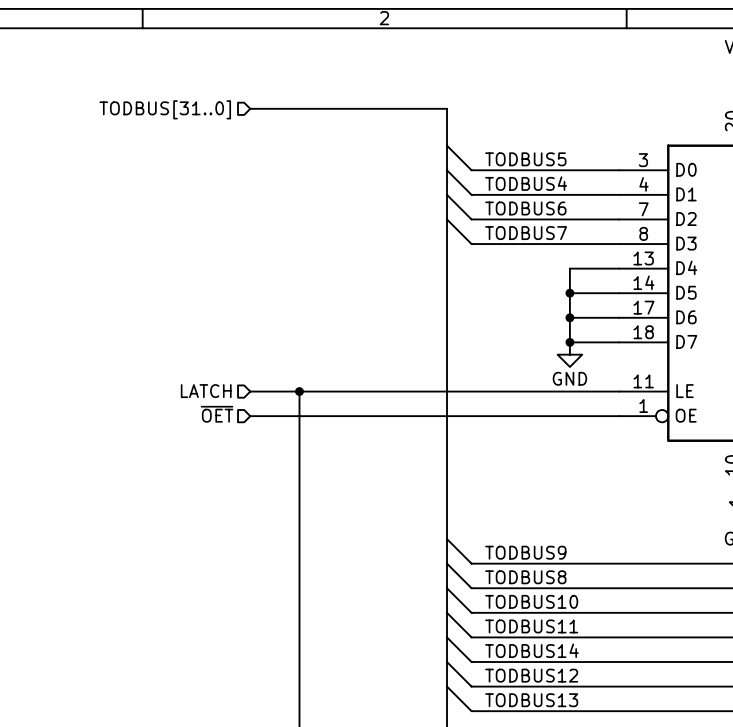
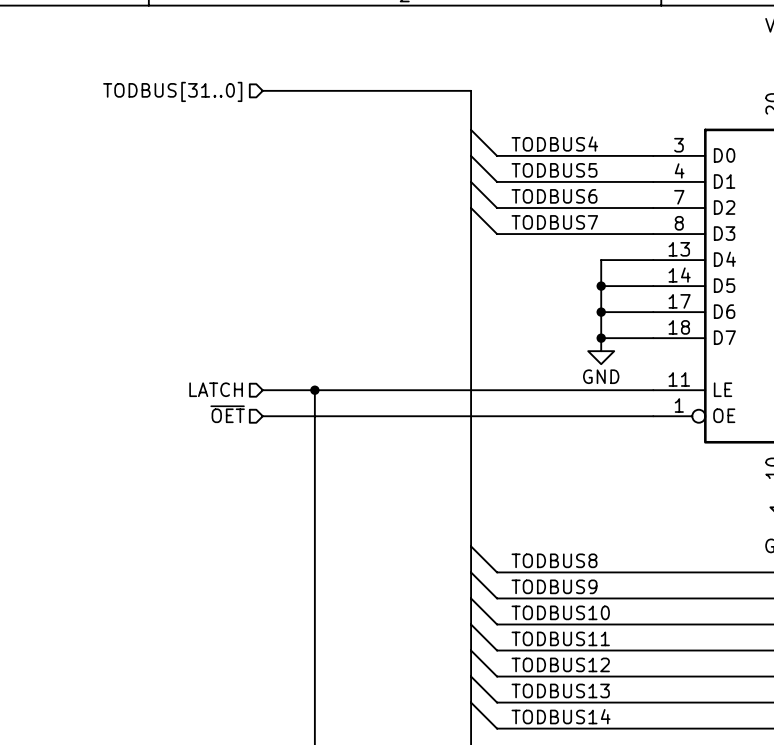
label: TODBUS5 (525, 159) -> TODBUS4 (554, 144)
label: TODBUS4 (526, 183) -> TODBUS5 (554, 170)
label: TODBUS9 (525, 552) -> TODBUS8 (554, 560)
label: TODBUS8 (525, 577) -> TODBUS9 (554, 586)
label: TODBUS14 (531, 650) -> TODBUS12 (560, 664)
label: TODBUS12 (531, 675) -> TODBUS13 (560, 690)
label: TODBUS13 (531, 700) -> TODBUS14 (561, 716)

